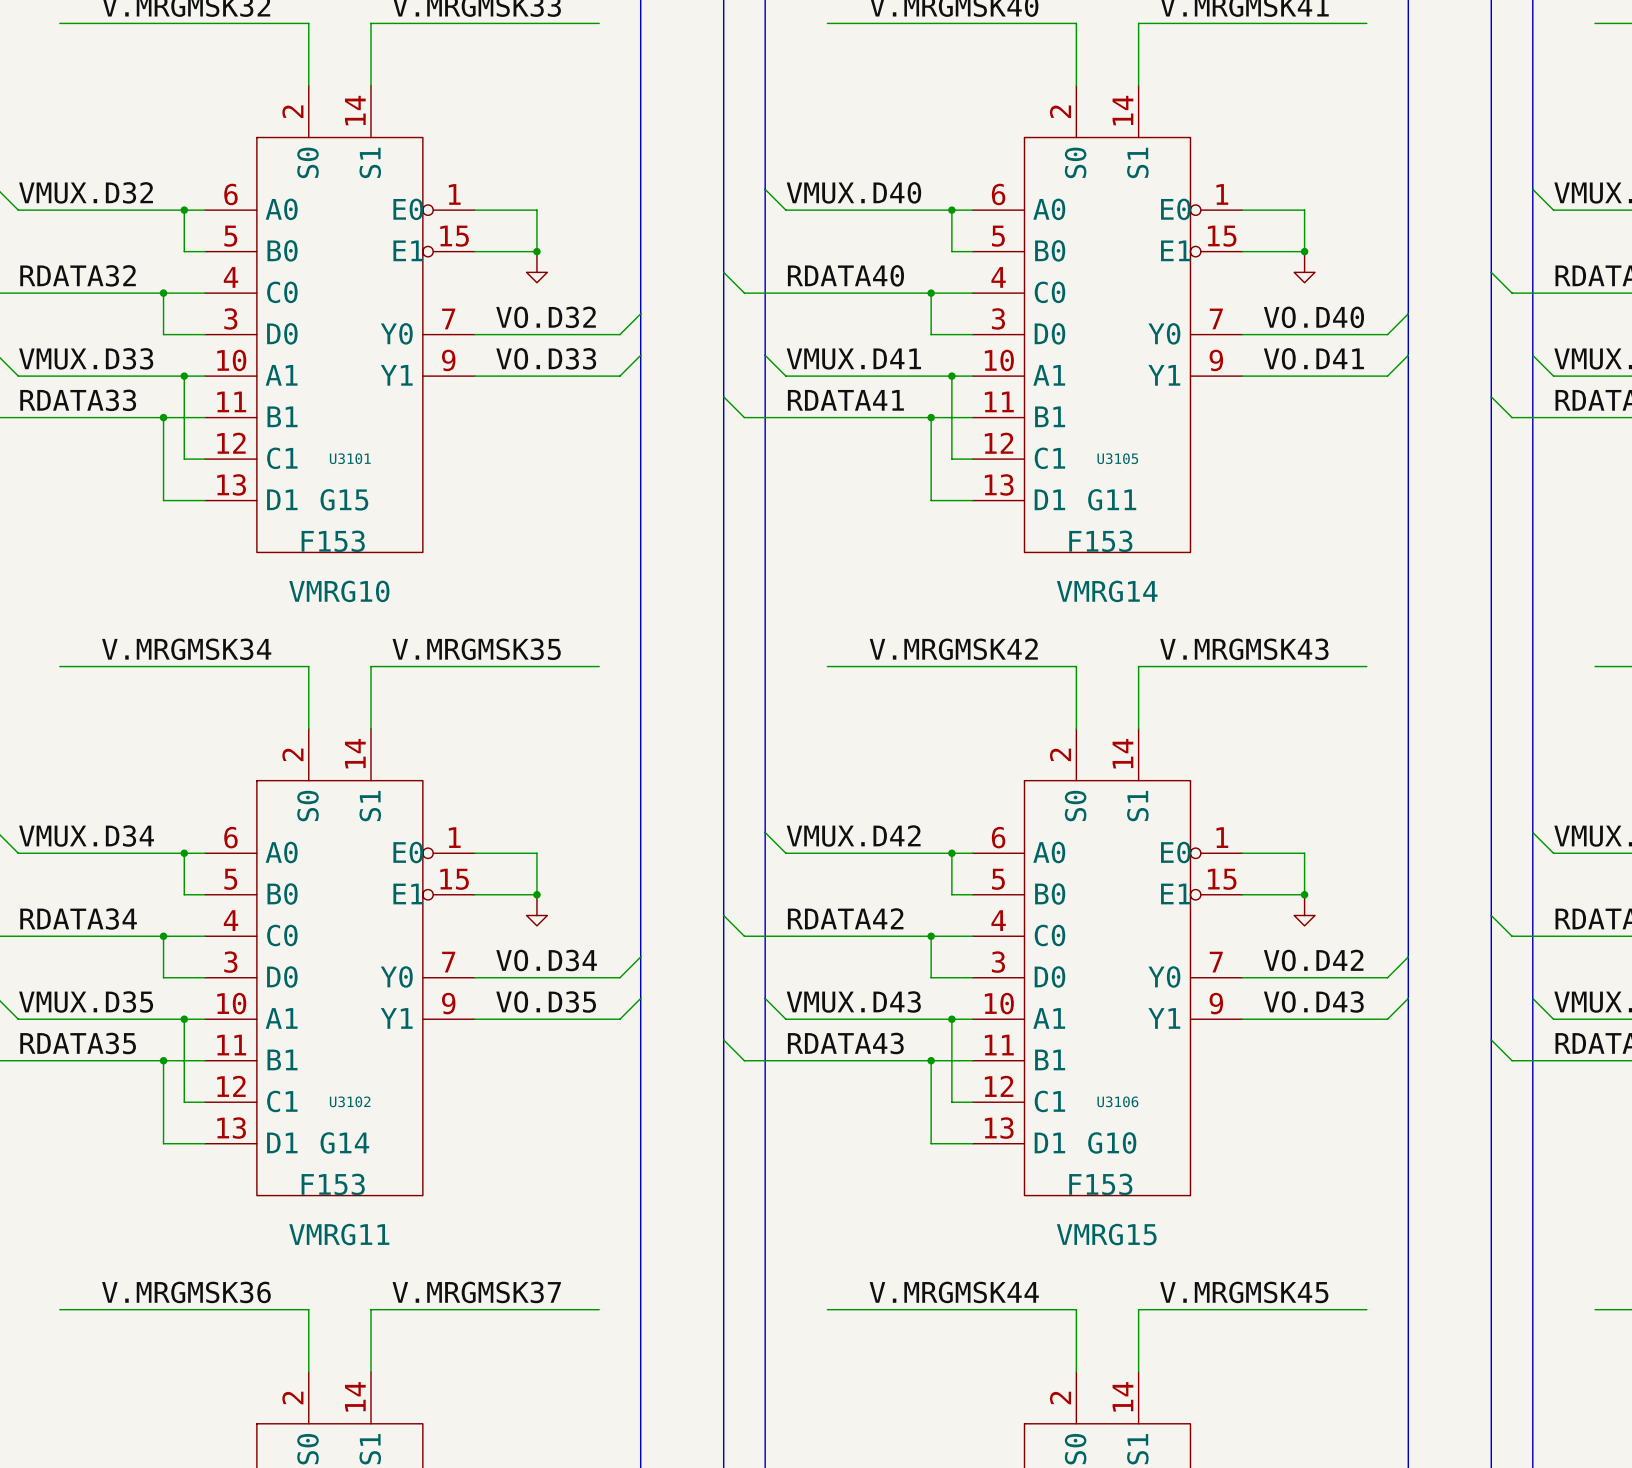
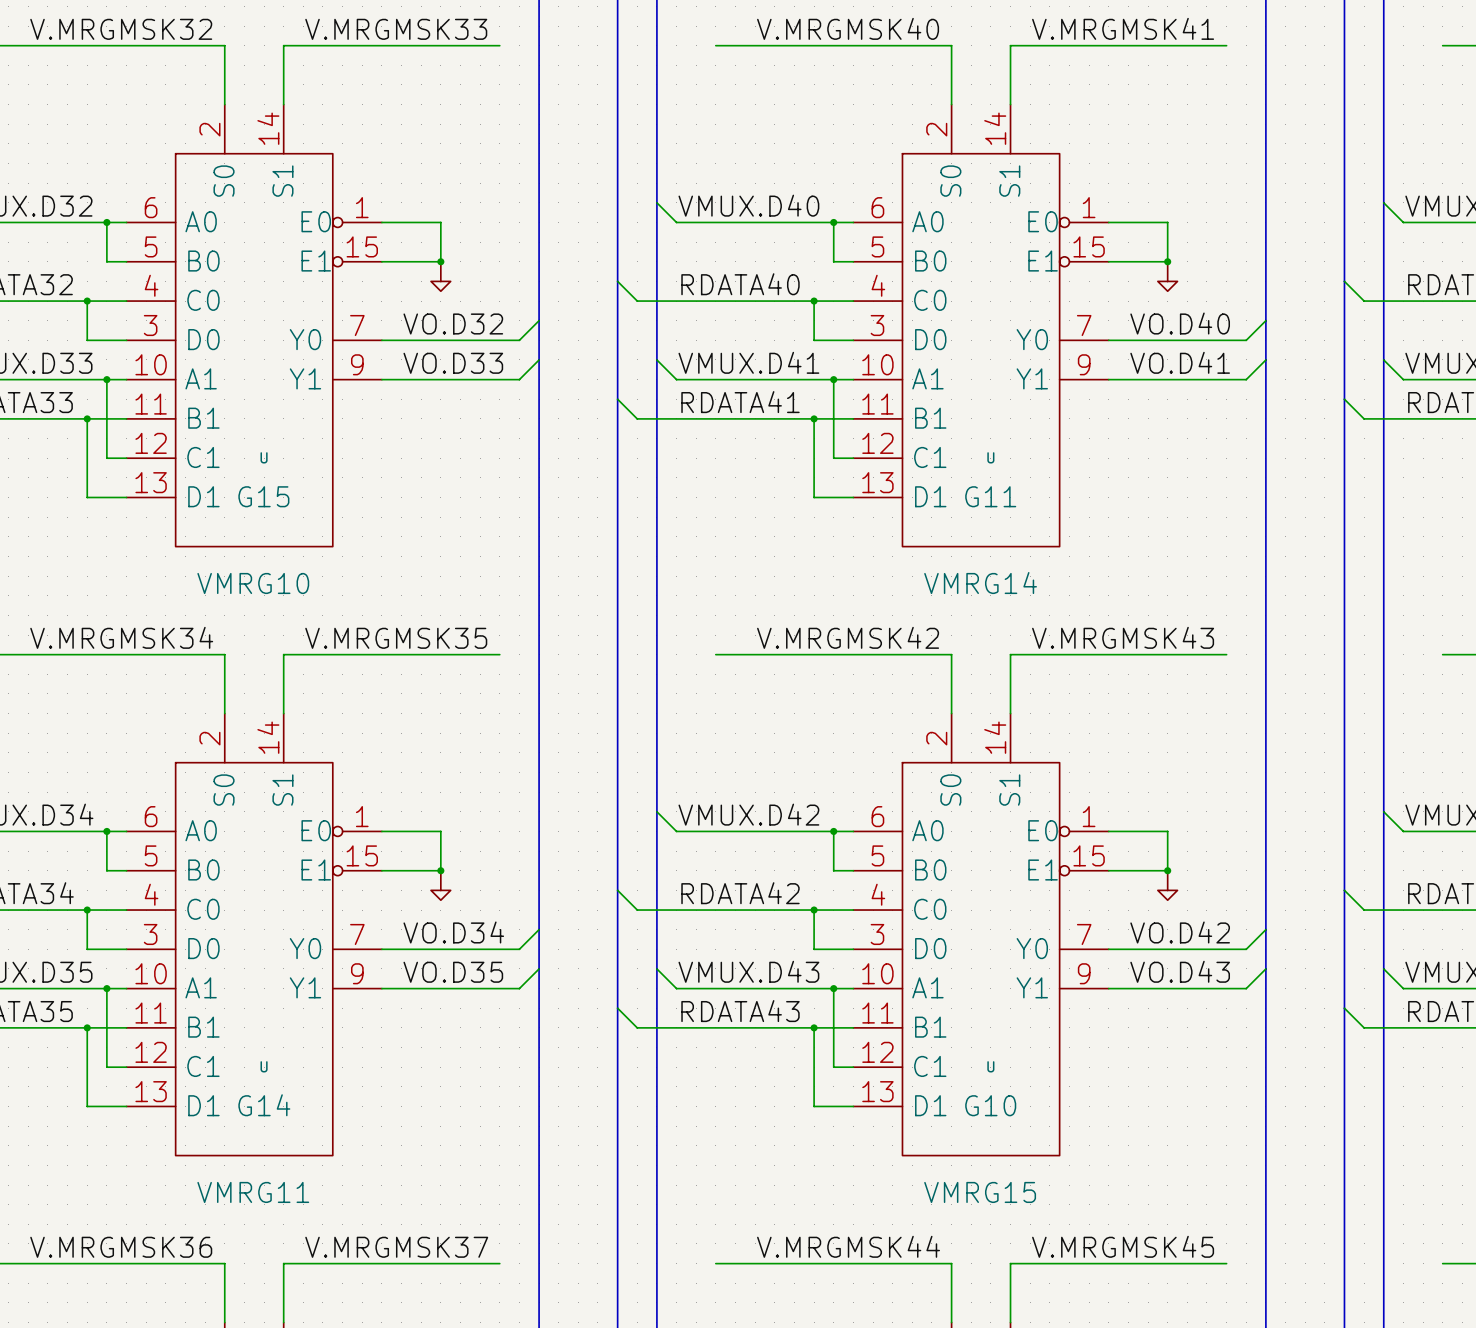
U3101 name: U3101 (350, 458) -> U (264, 457)
U3105 name: U3105 (1117, 458) -> U (990, 457)
U3101 value: F153 (333, 541) -> none
U3105 value: F153 (1100, 541) -> none
U3102 name: U3102 (350, 1101) -> U (264, 1066)
U3106 name: U3106 (1117, 1101) -> U (990, 1066)
U3102 value: F153 (333, 1184) -> none
U3106 value: F153 (1100, 1184) -> none

